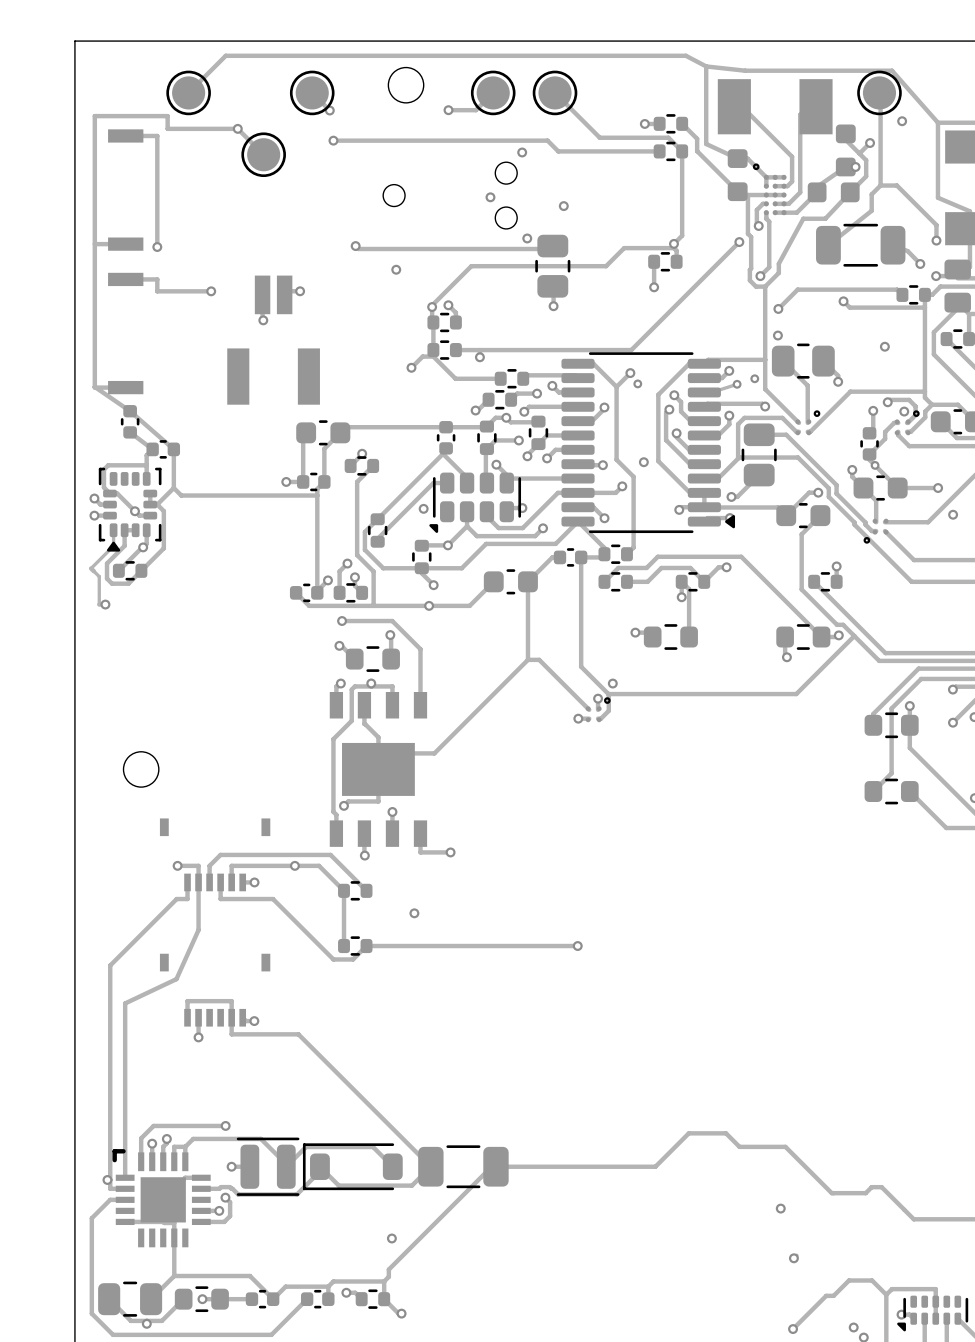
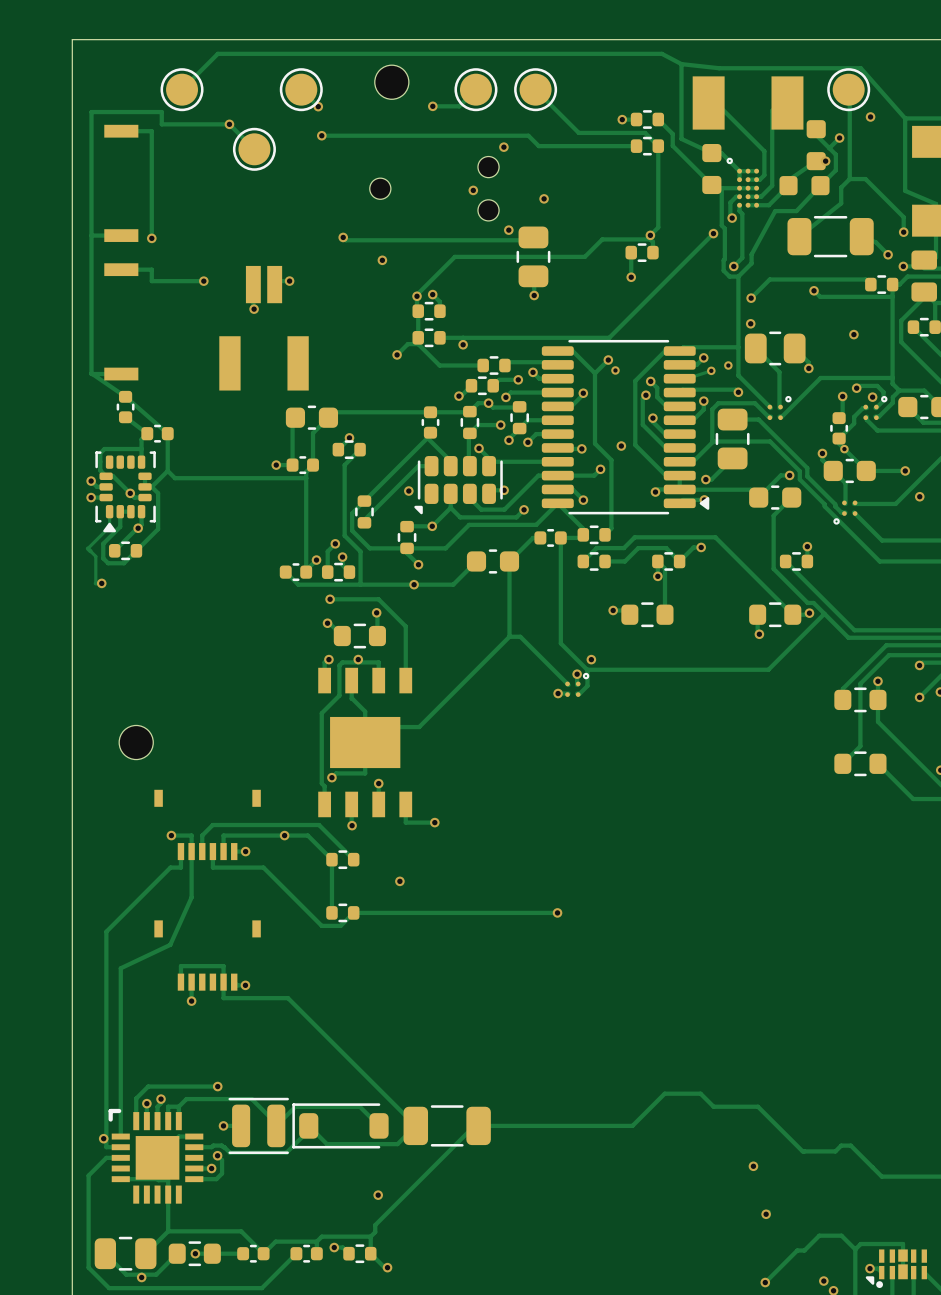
part footprint: [897, 1295, 969, 1332] -> [865, 1249, 927, 1289]

